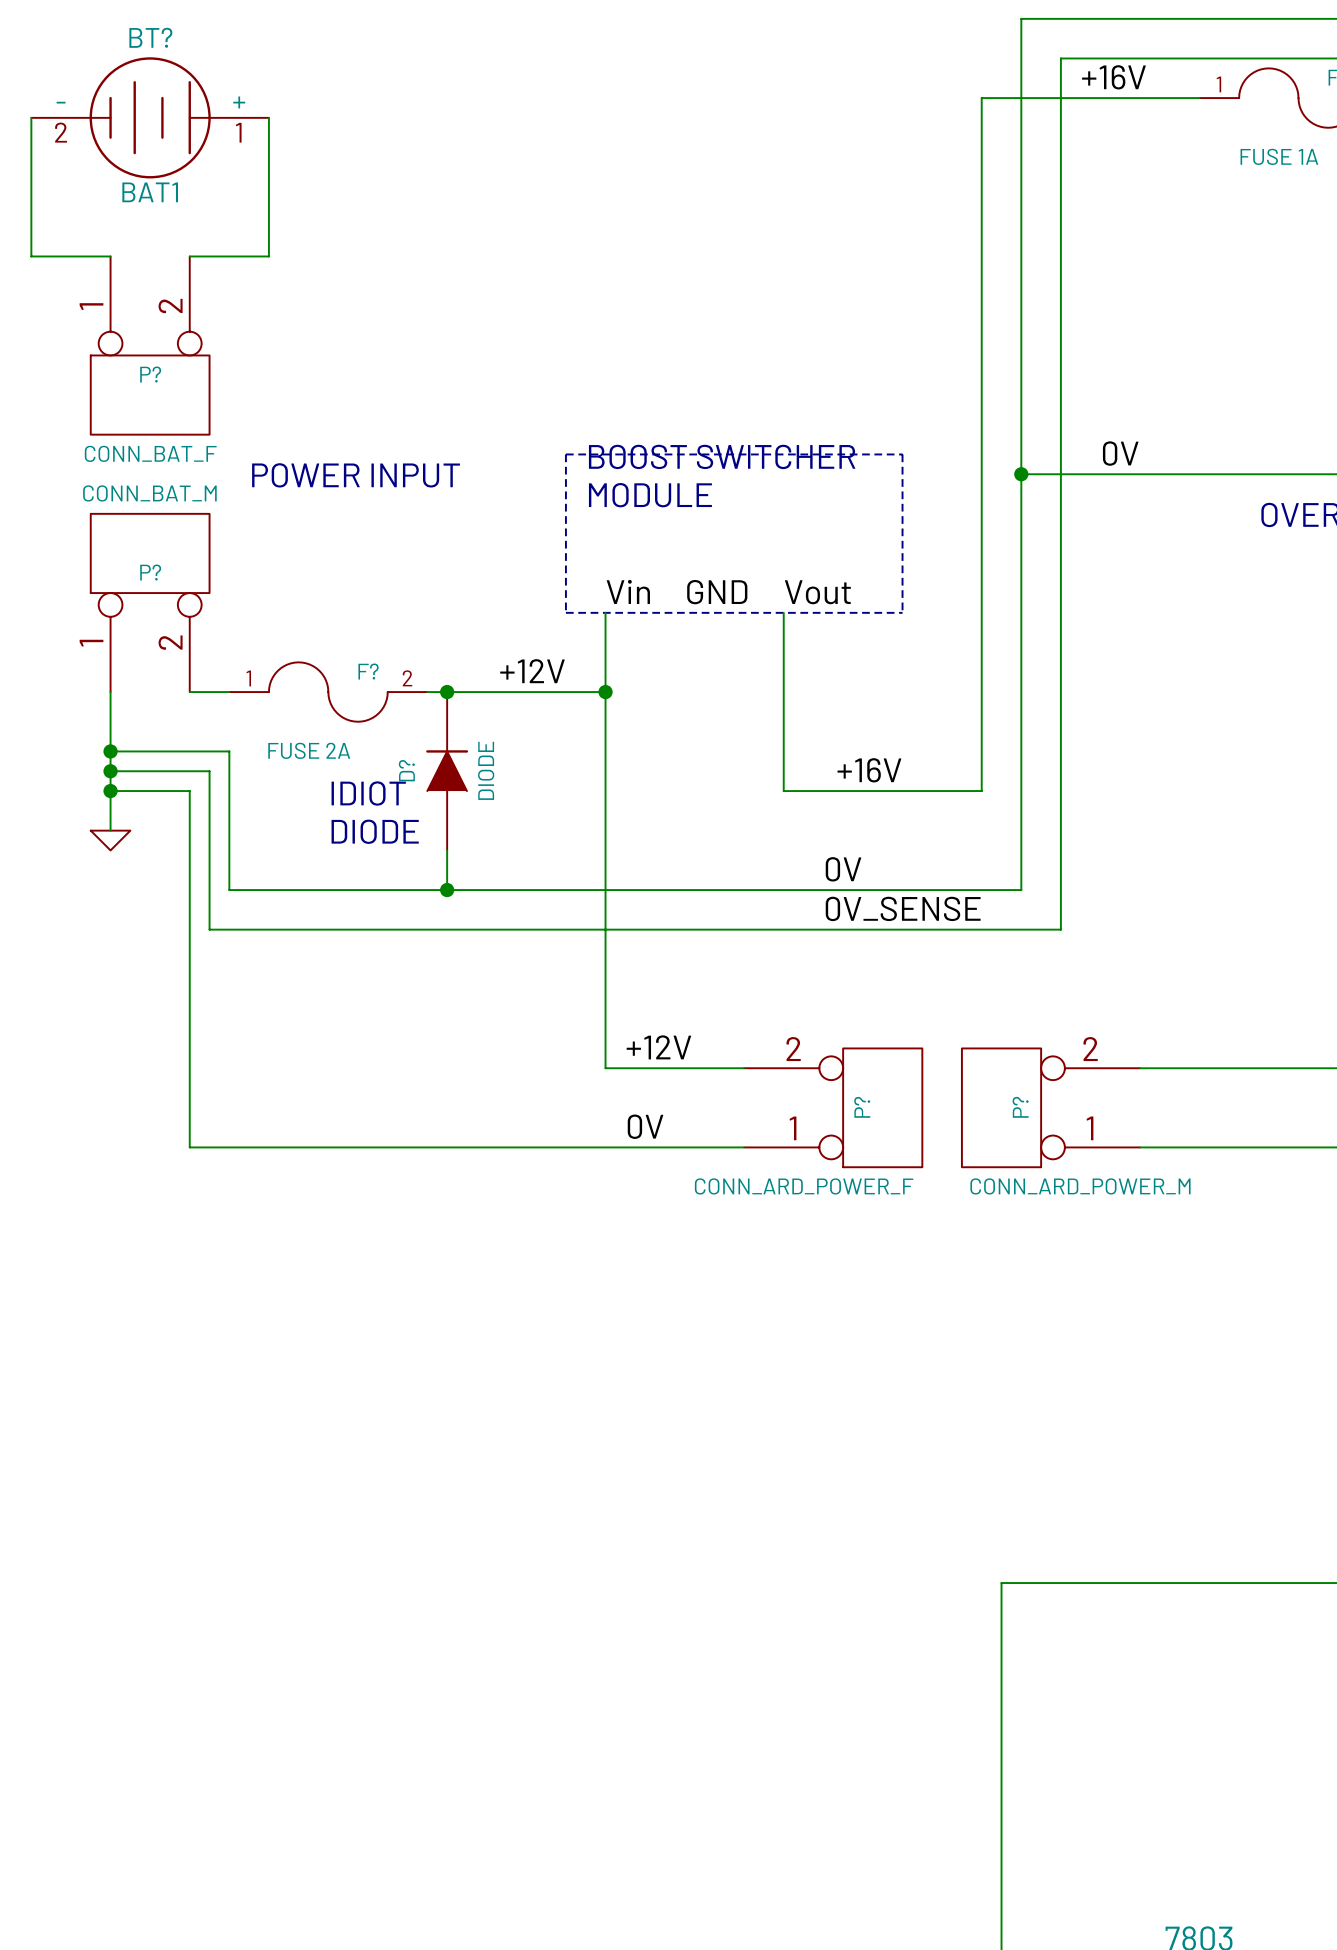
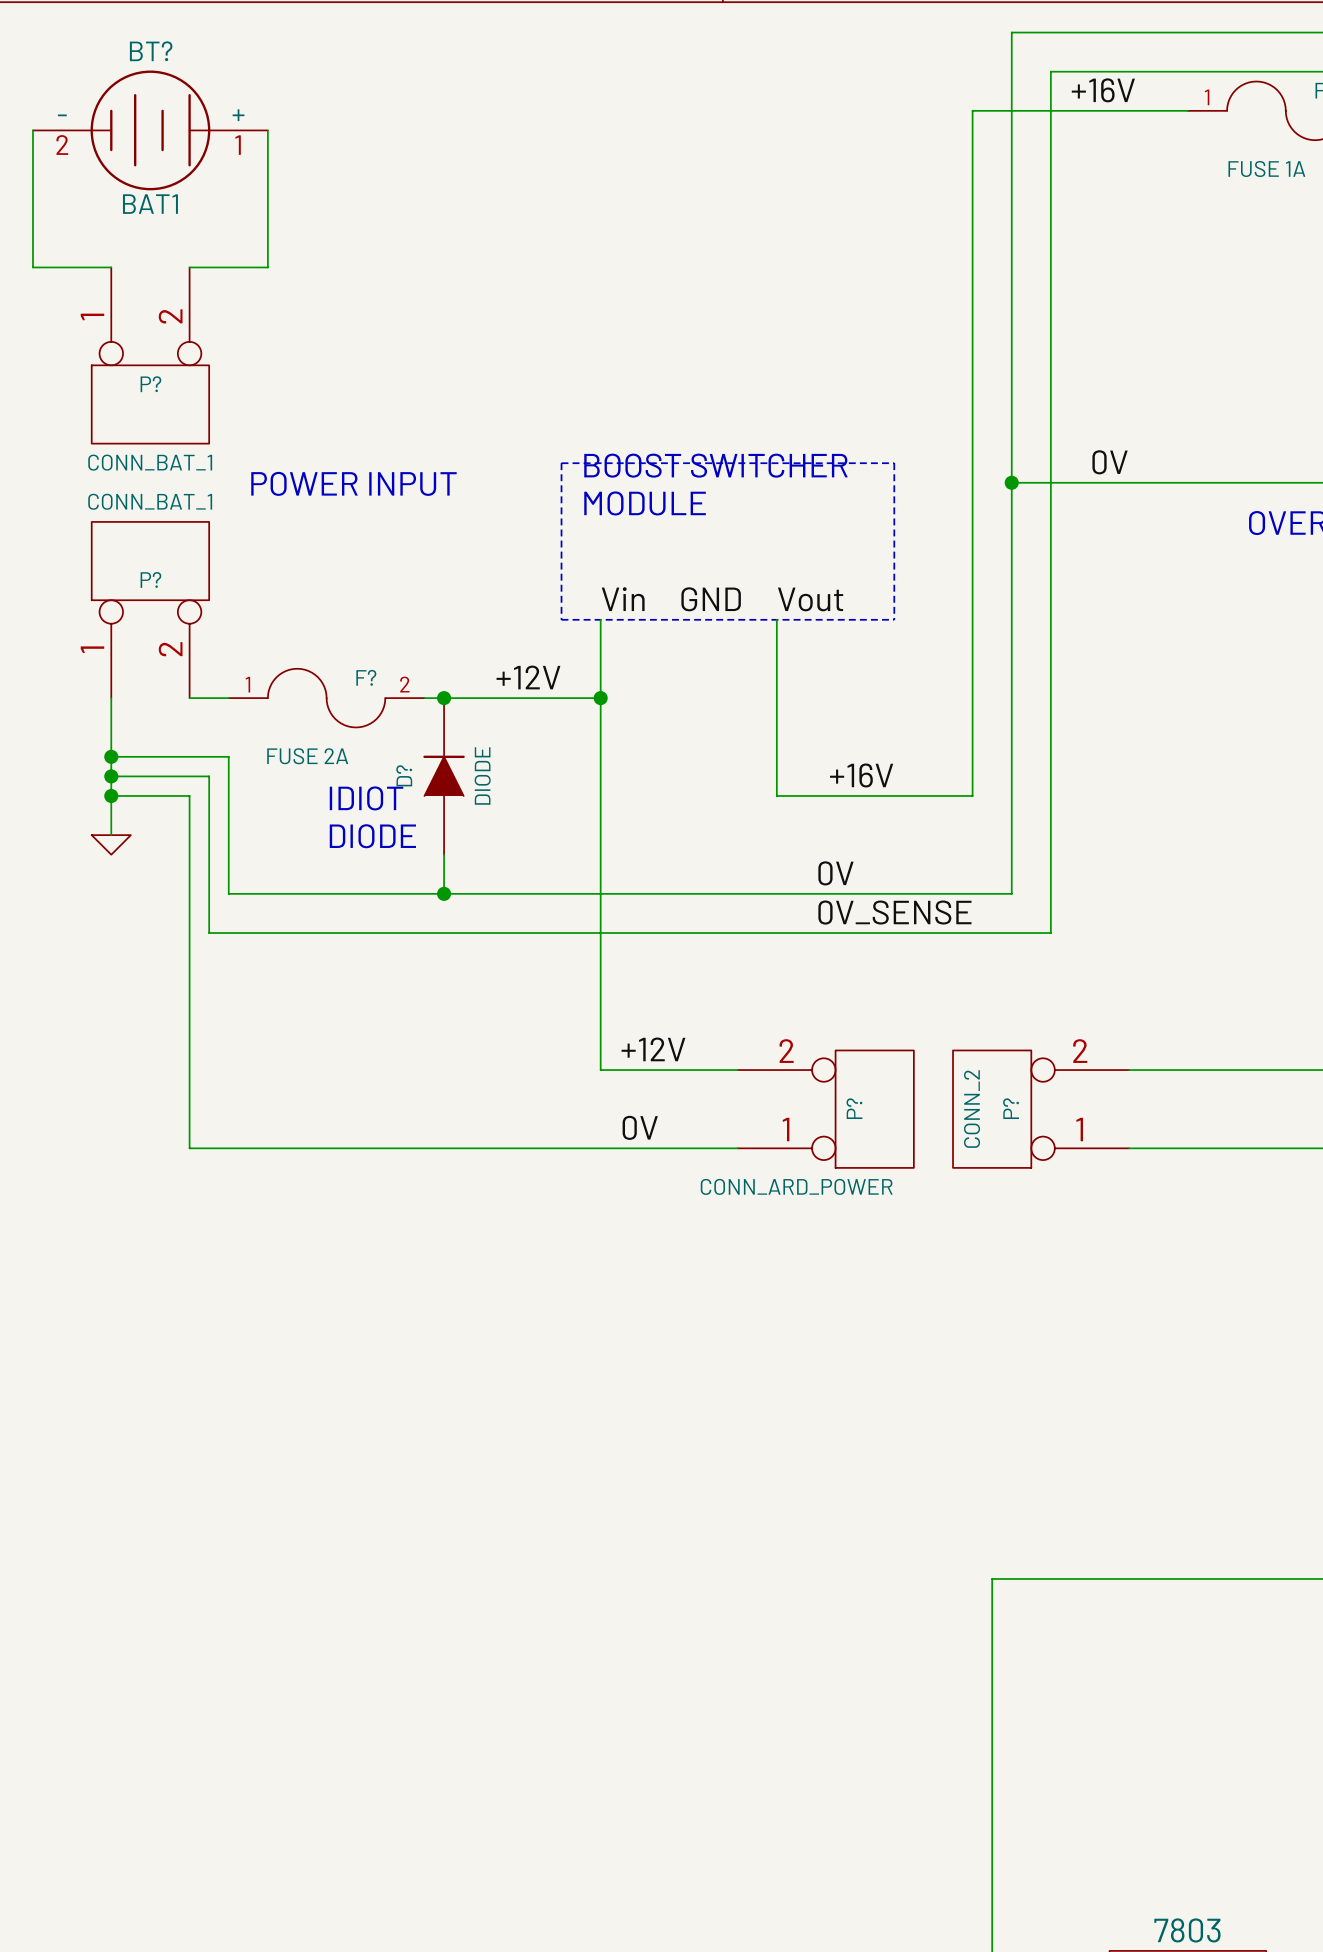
P? value: CONN_BAT_F (150, 453) -> CONN_BAT_1 (150, 462)
P? value: CONN_BAT_M (149, 493) -> CONN_BAT_1 (150, 501)
P? value: CONN_ARD_POWER_F (804, 1186) -> CONN_ARD_POWER (796, 1186)
P? value: CONN_ARD_POWER_M (1080, 1186) -> CONN_2 (972, 1109)

